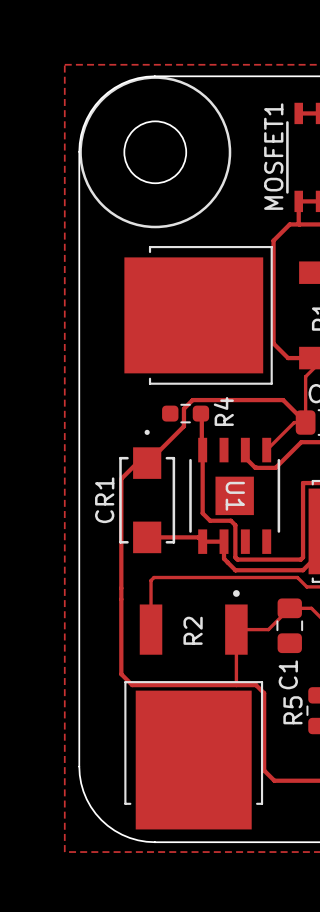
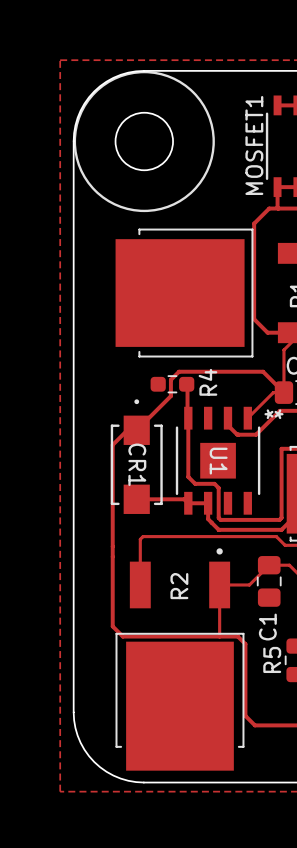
U1 footprint: [189, 437, 281, 554] -> [175, 406, 261, 515]
CR1 name rotation: 0° (104, 500) -> 180° (137, 464)

